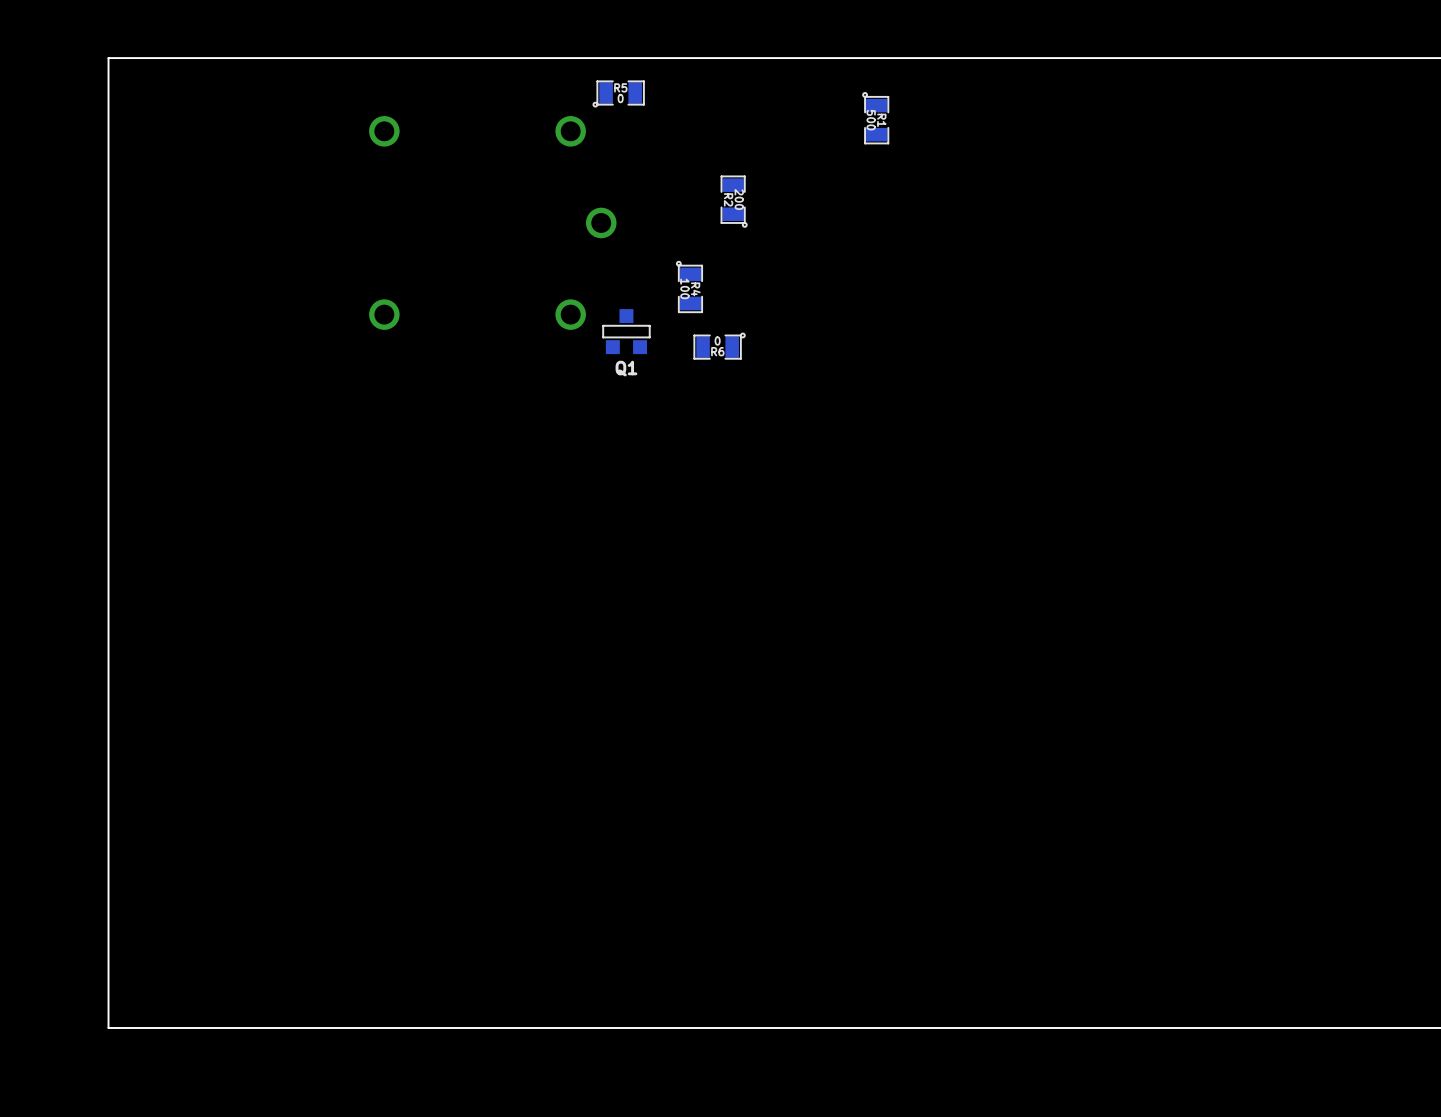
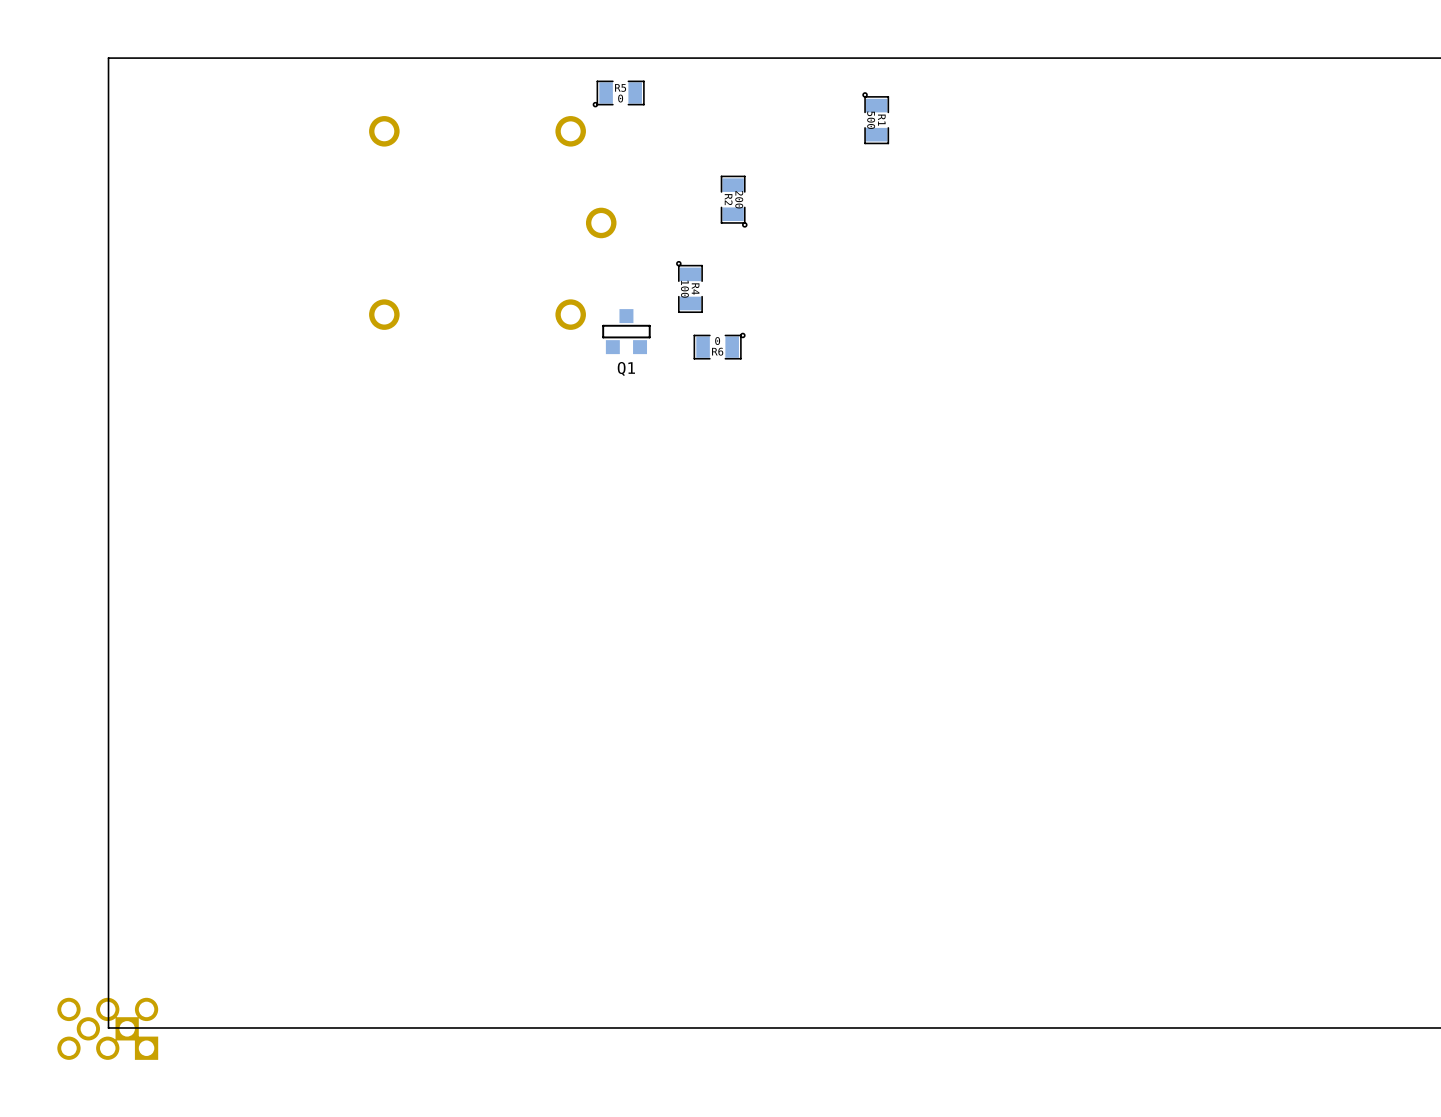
part: none -> (107, 1028)
part: none -> (107, 1028)

